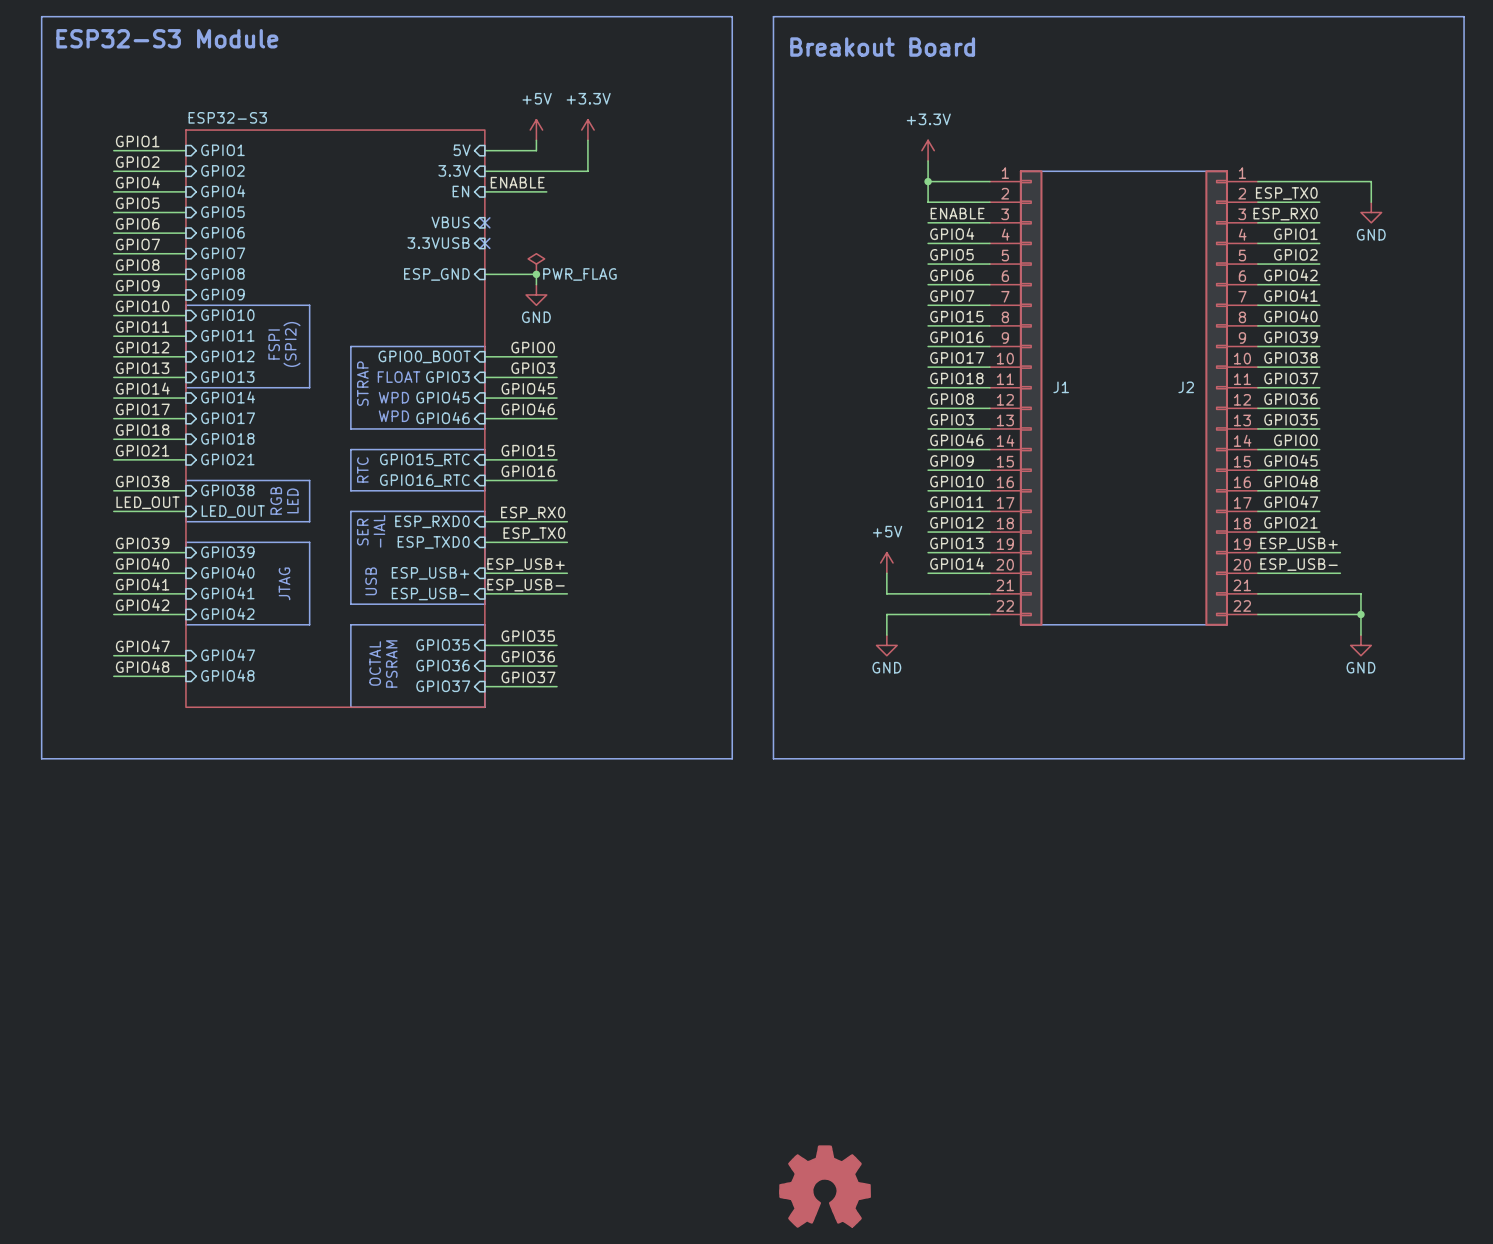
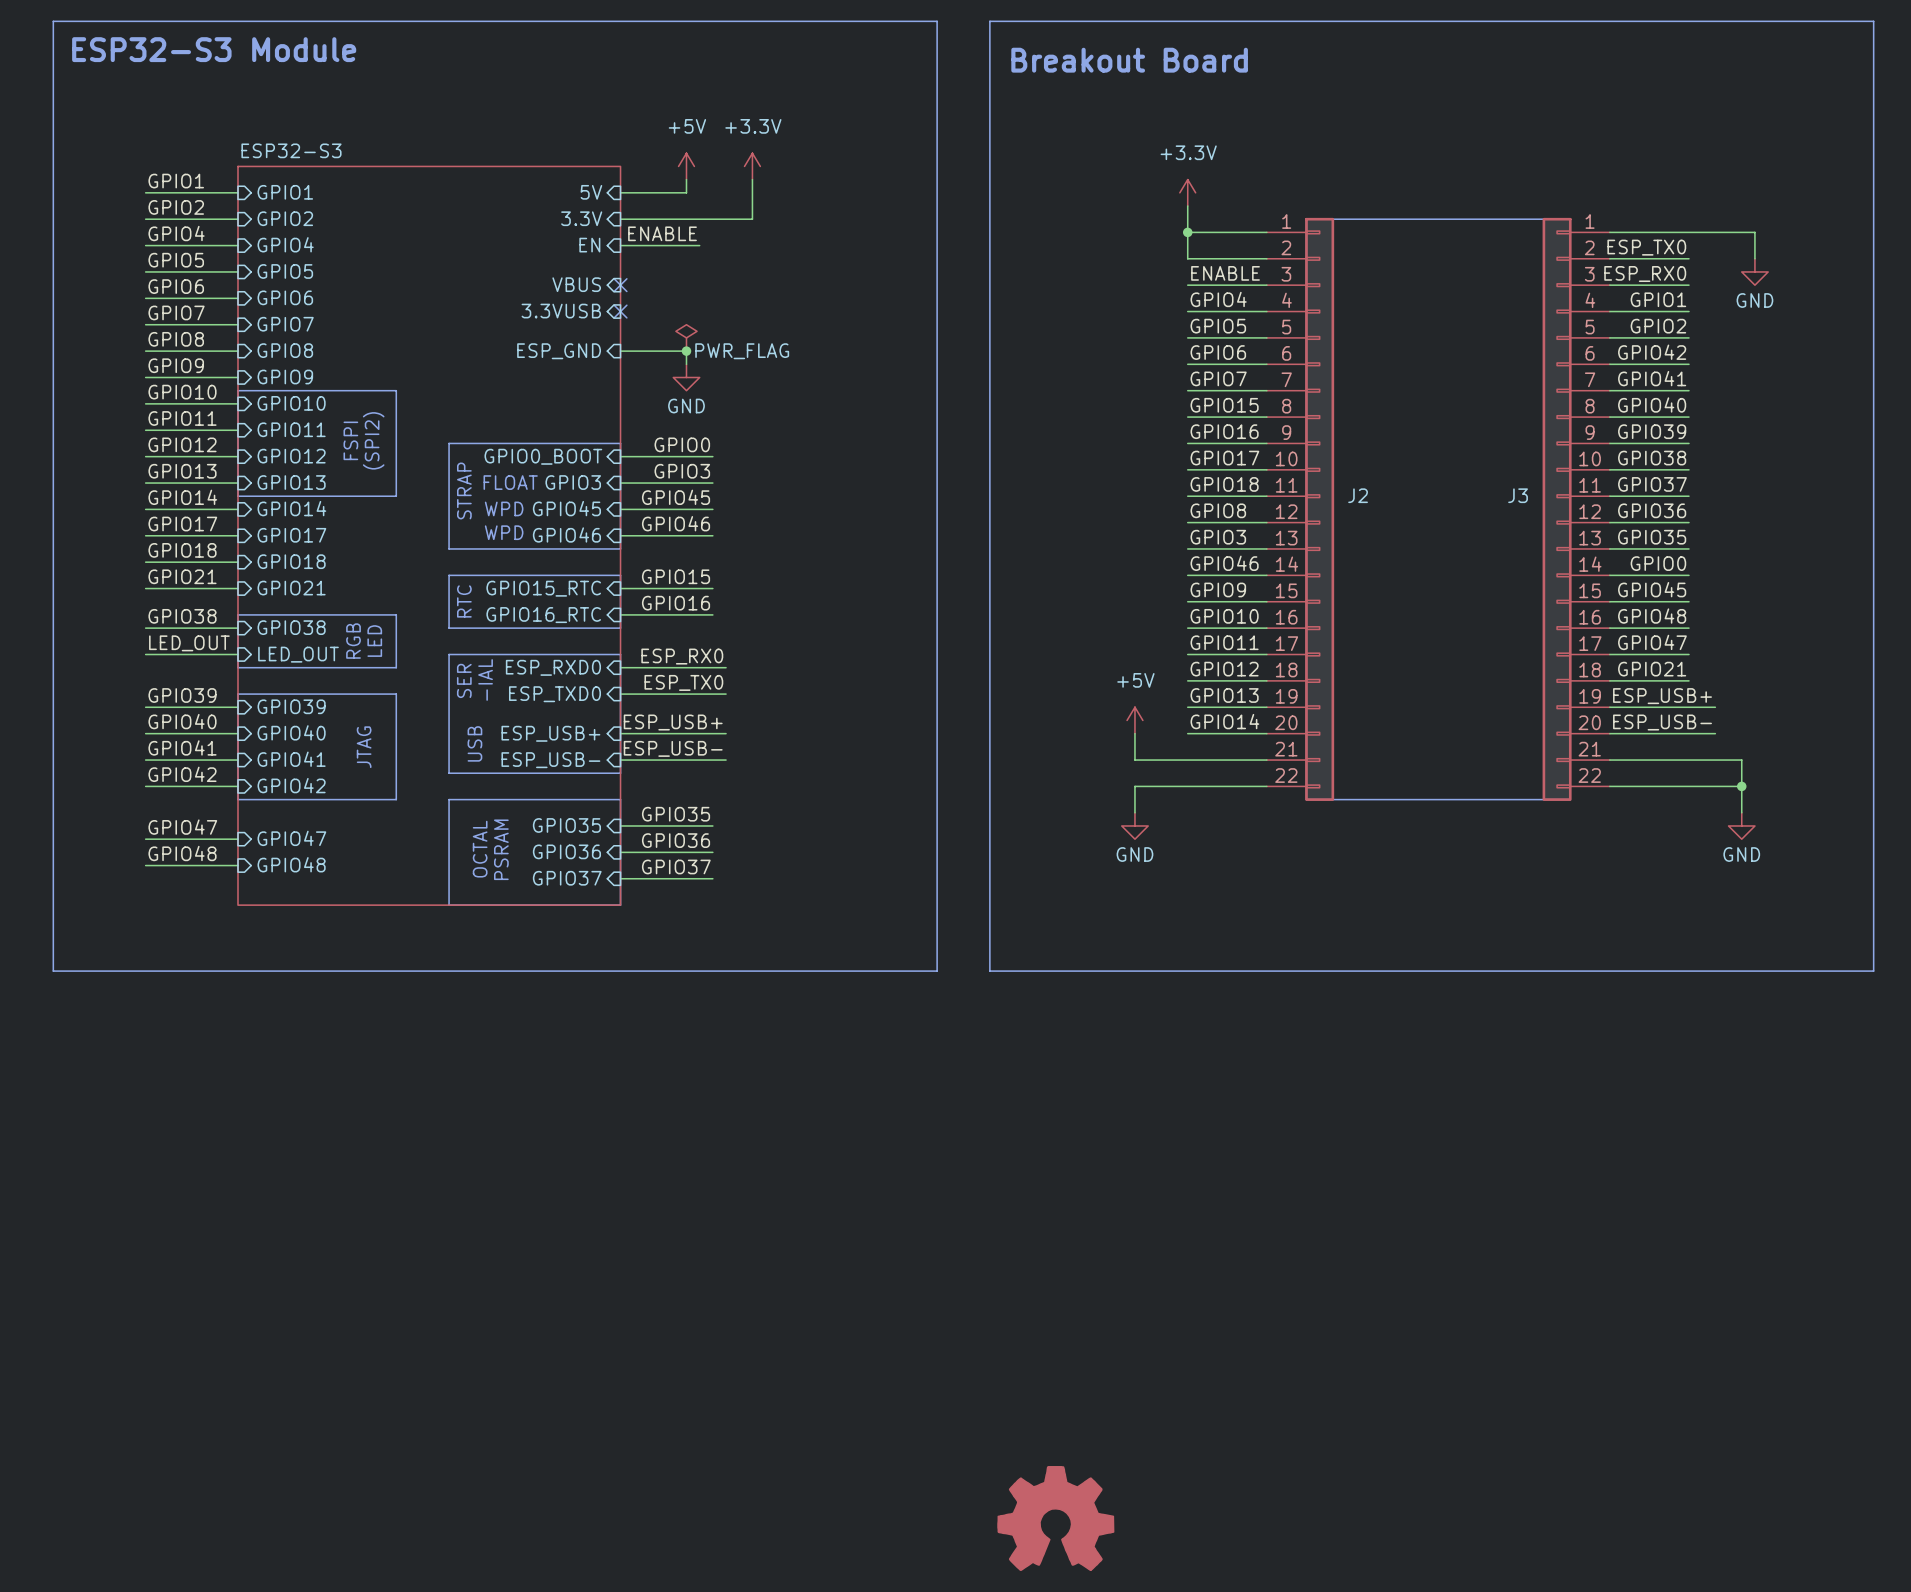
J1 name: J1 (1061, 387) -> J2 (1358, 495)
J2 name: J2 (1186, 387) -> J3 (1518, 495)

